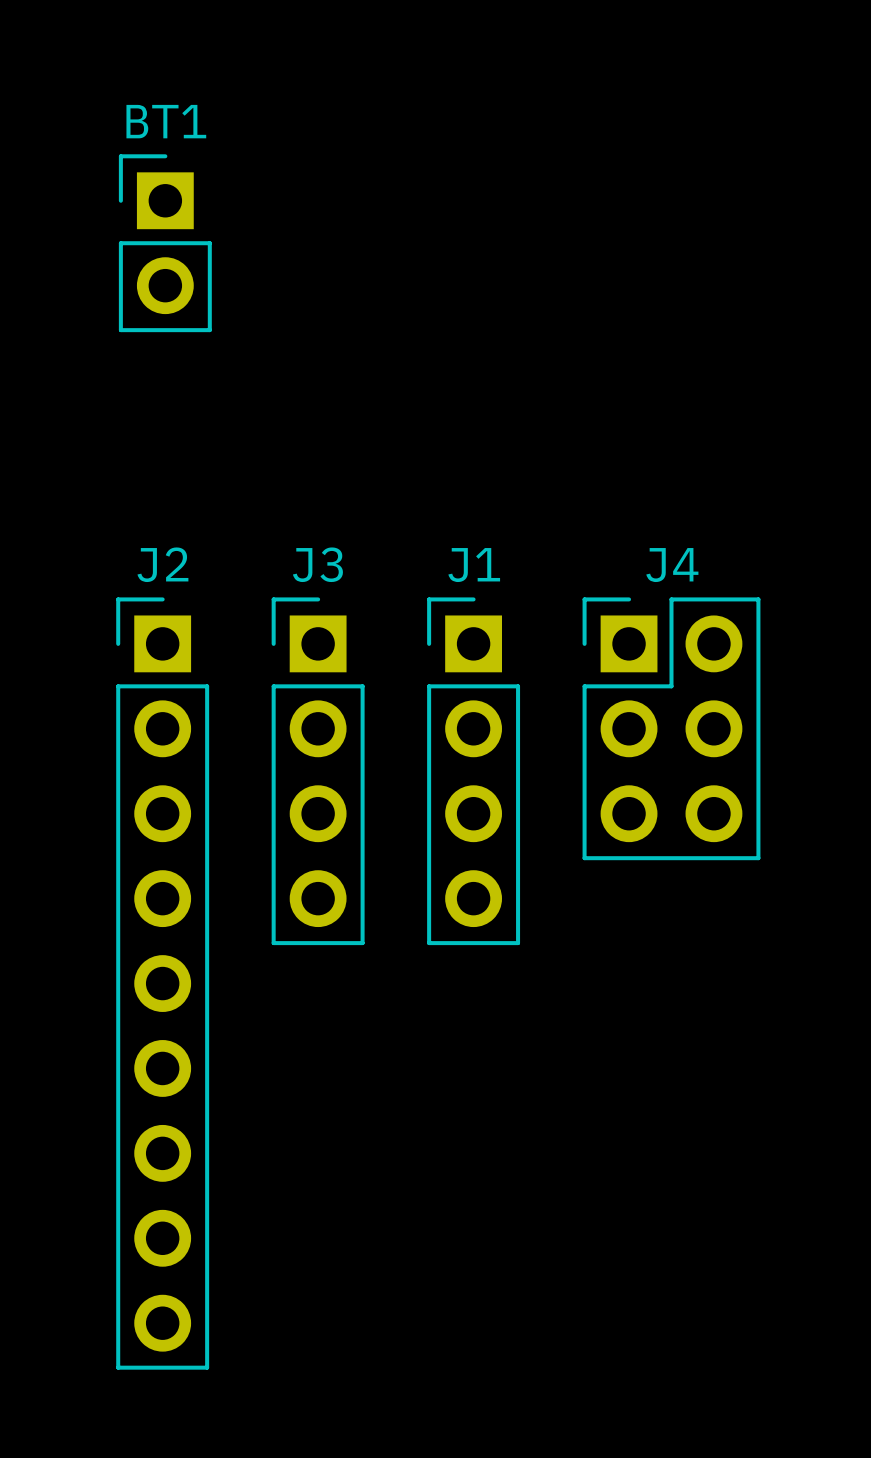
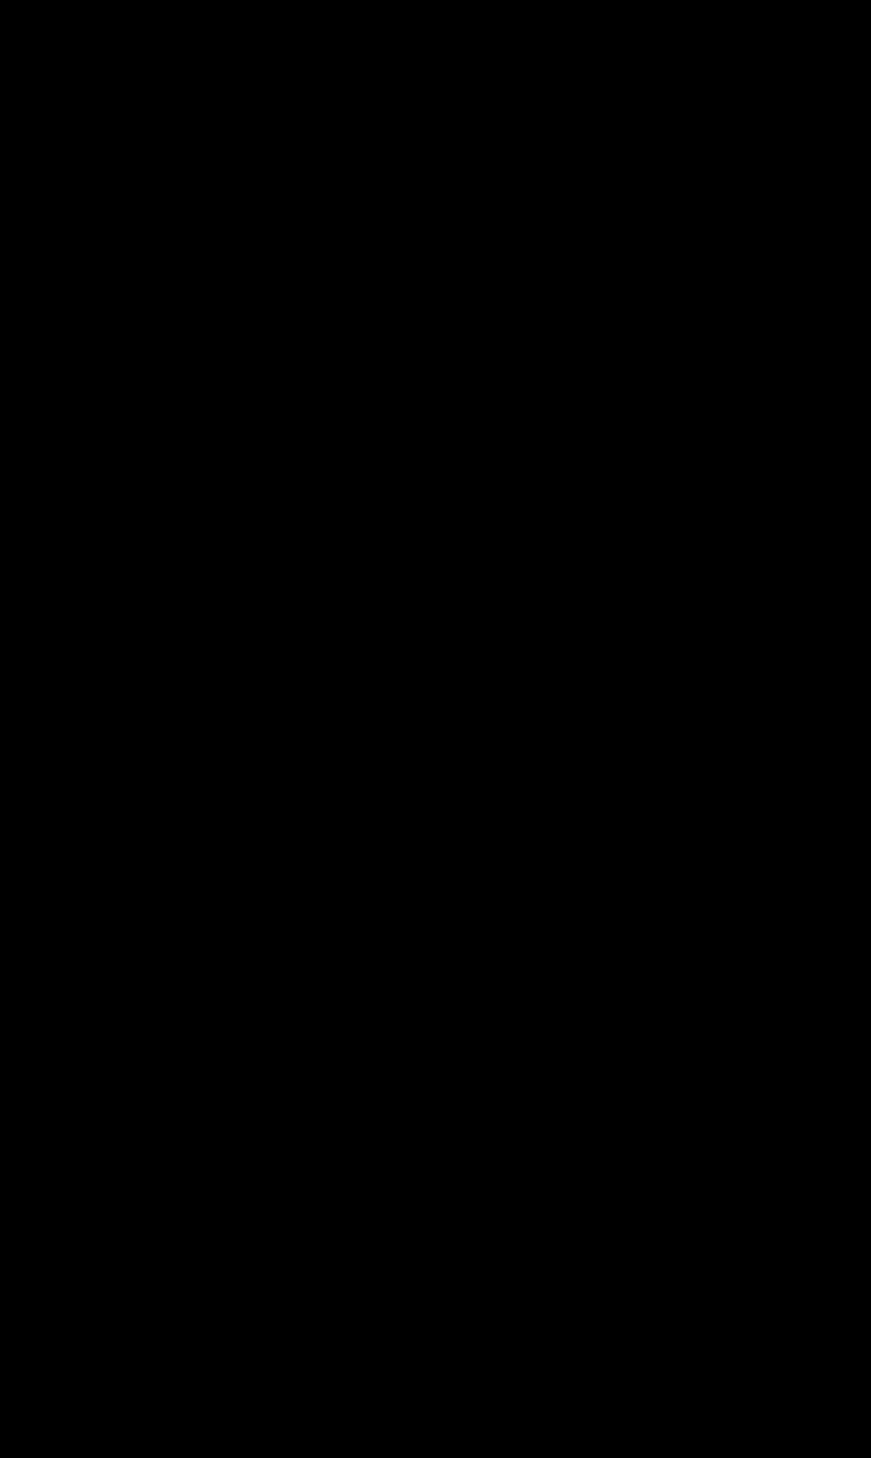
BT1: (165, 243) -> none
J4: (671, 728) -> none
J3: (318, 771) -> none
J1: (473, 771) -> none
J2: (162, 983) -> none

